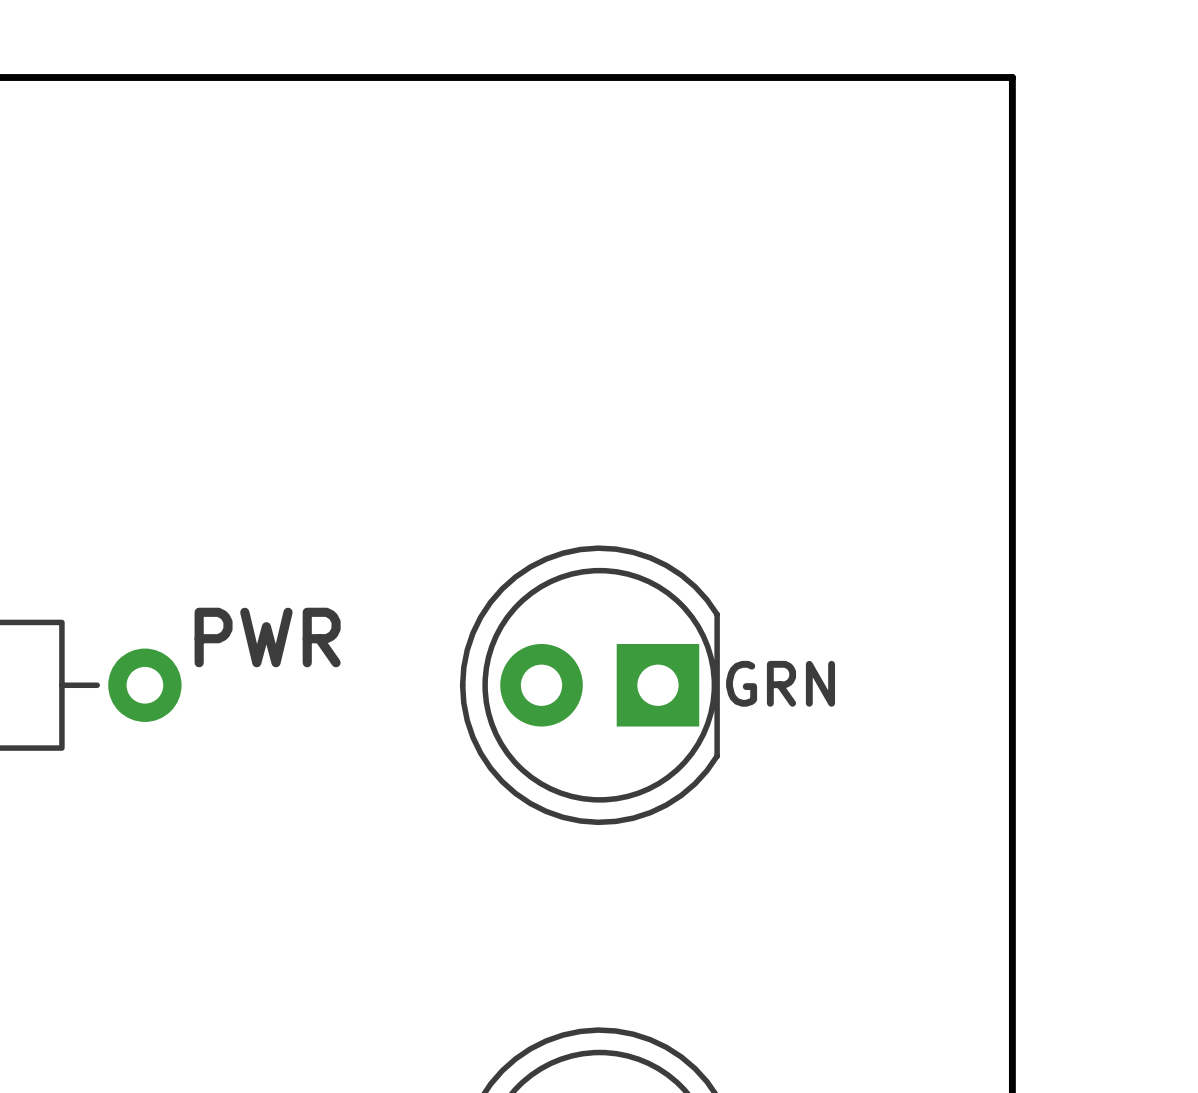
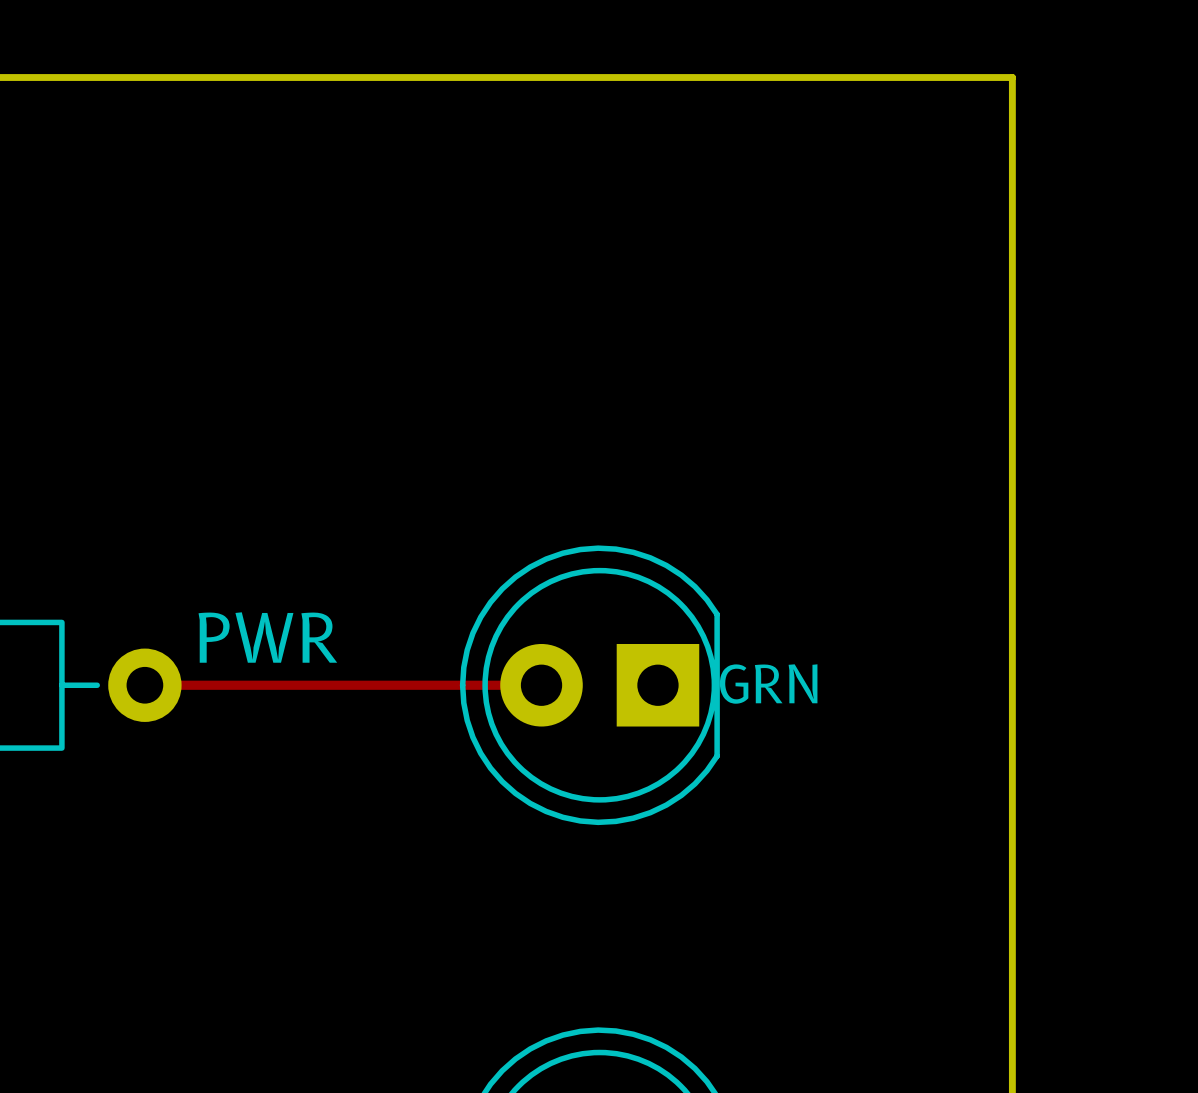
track: none -> (144, 685) (541, 685)

